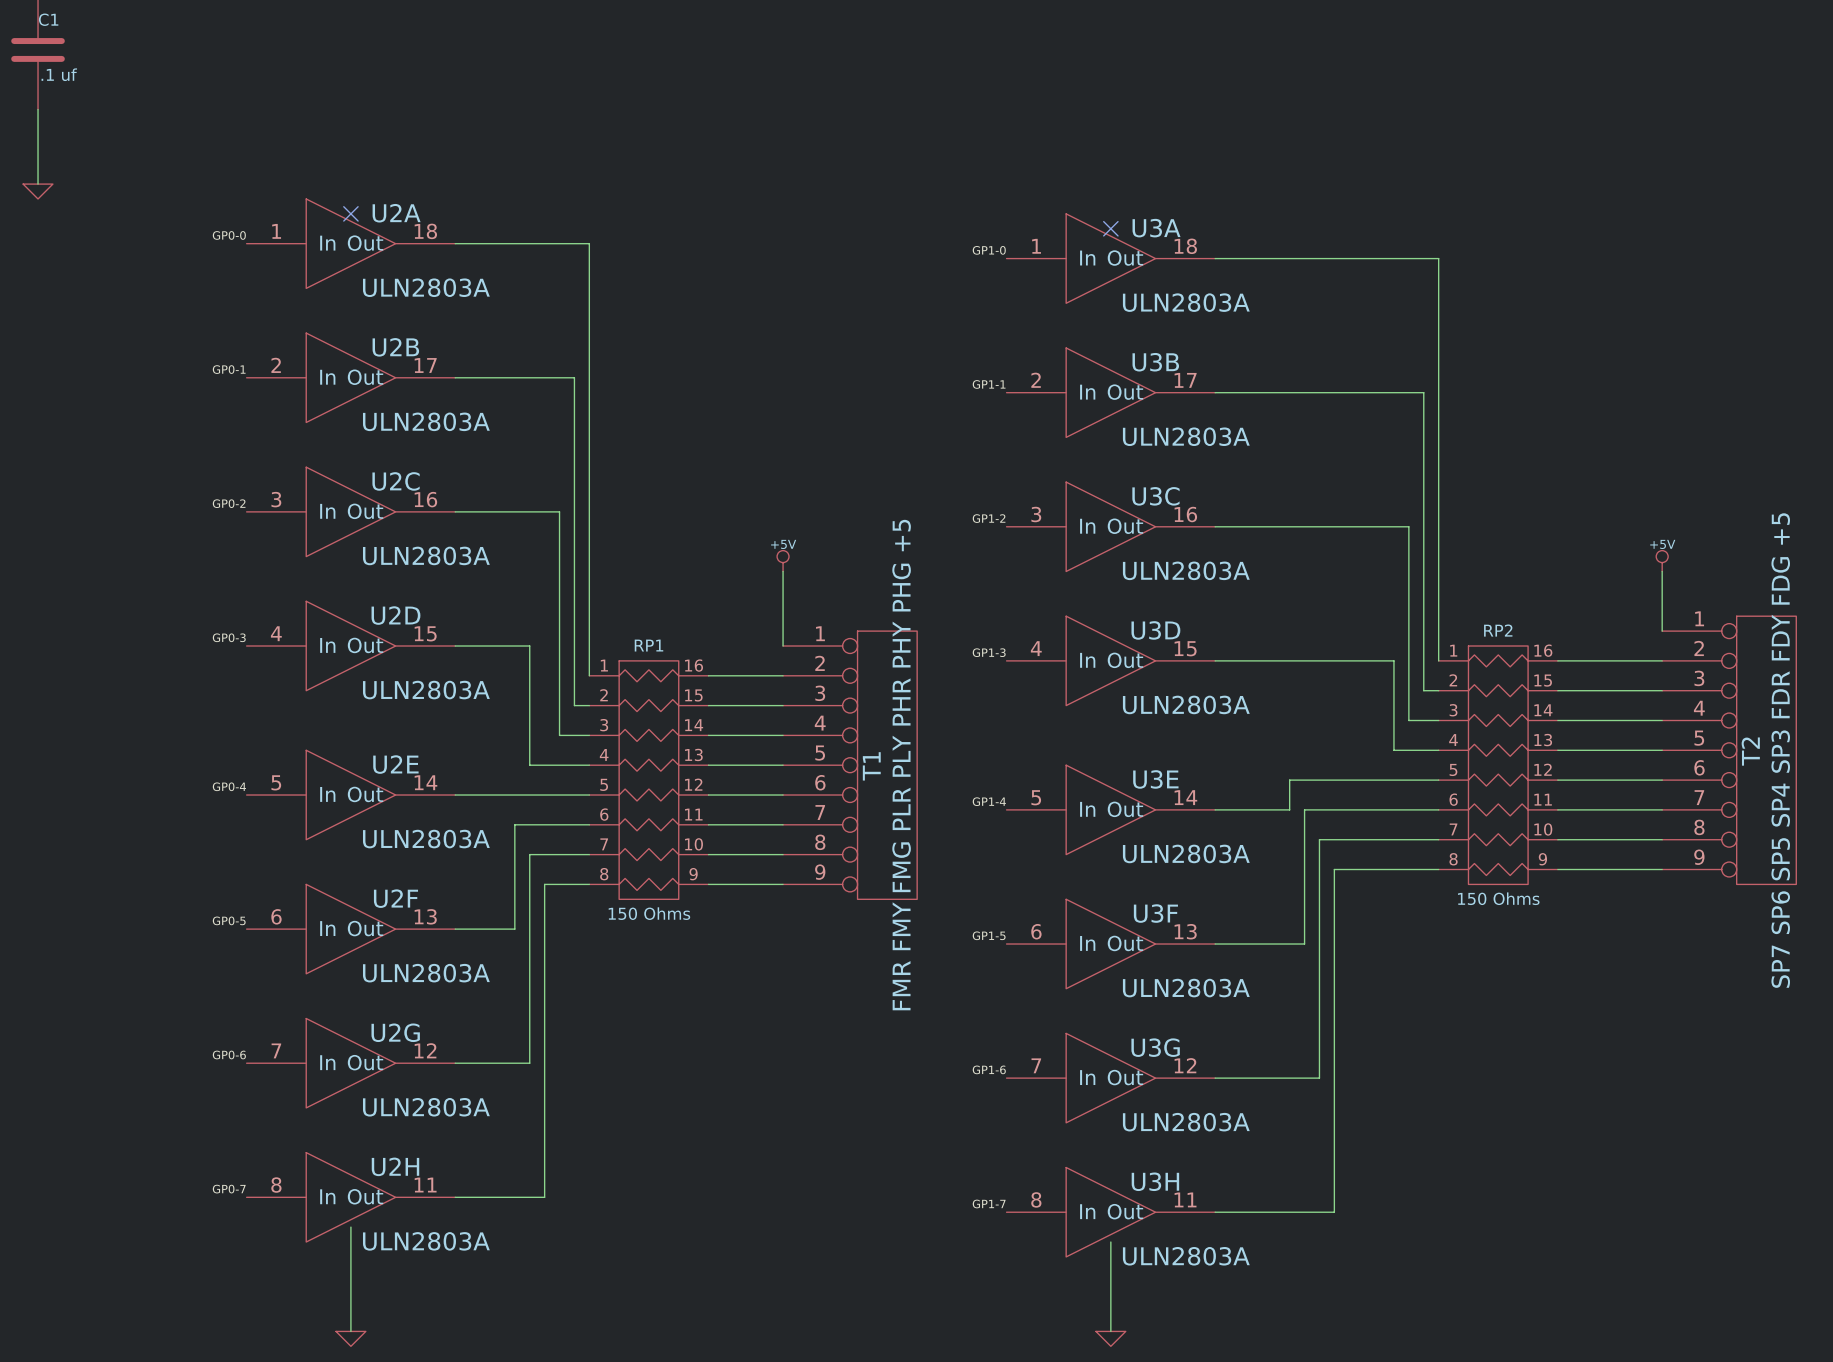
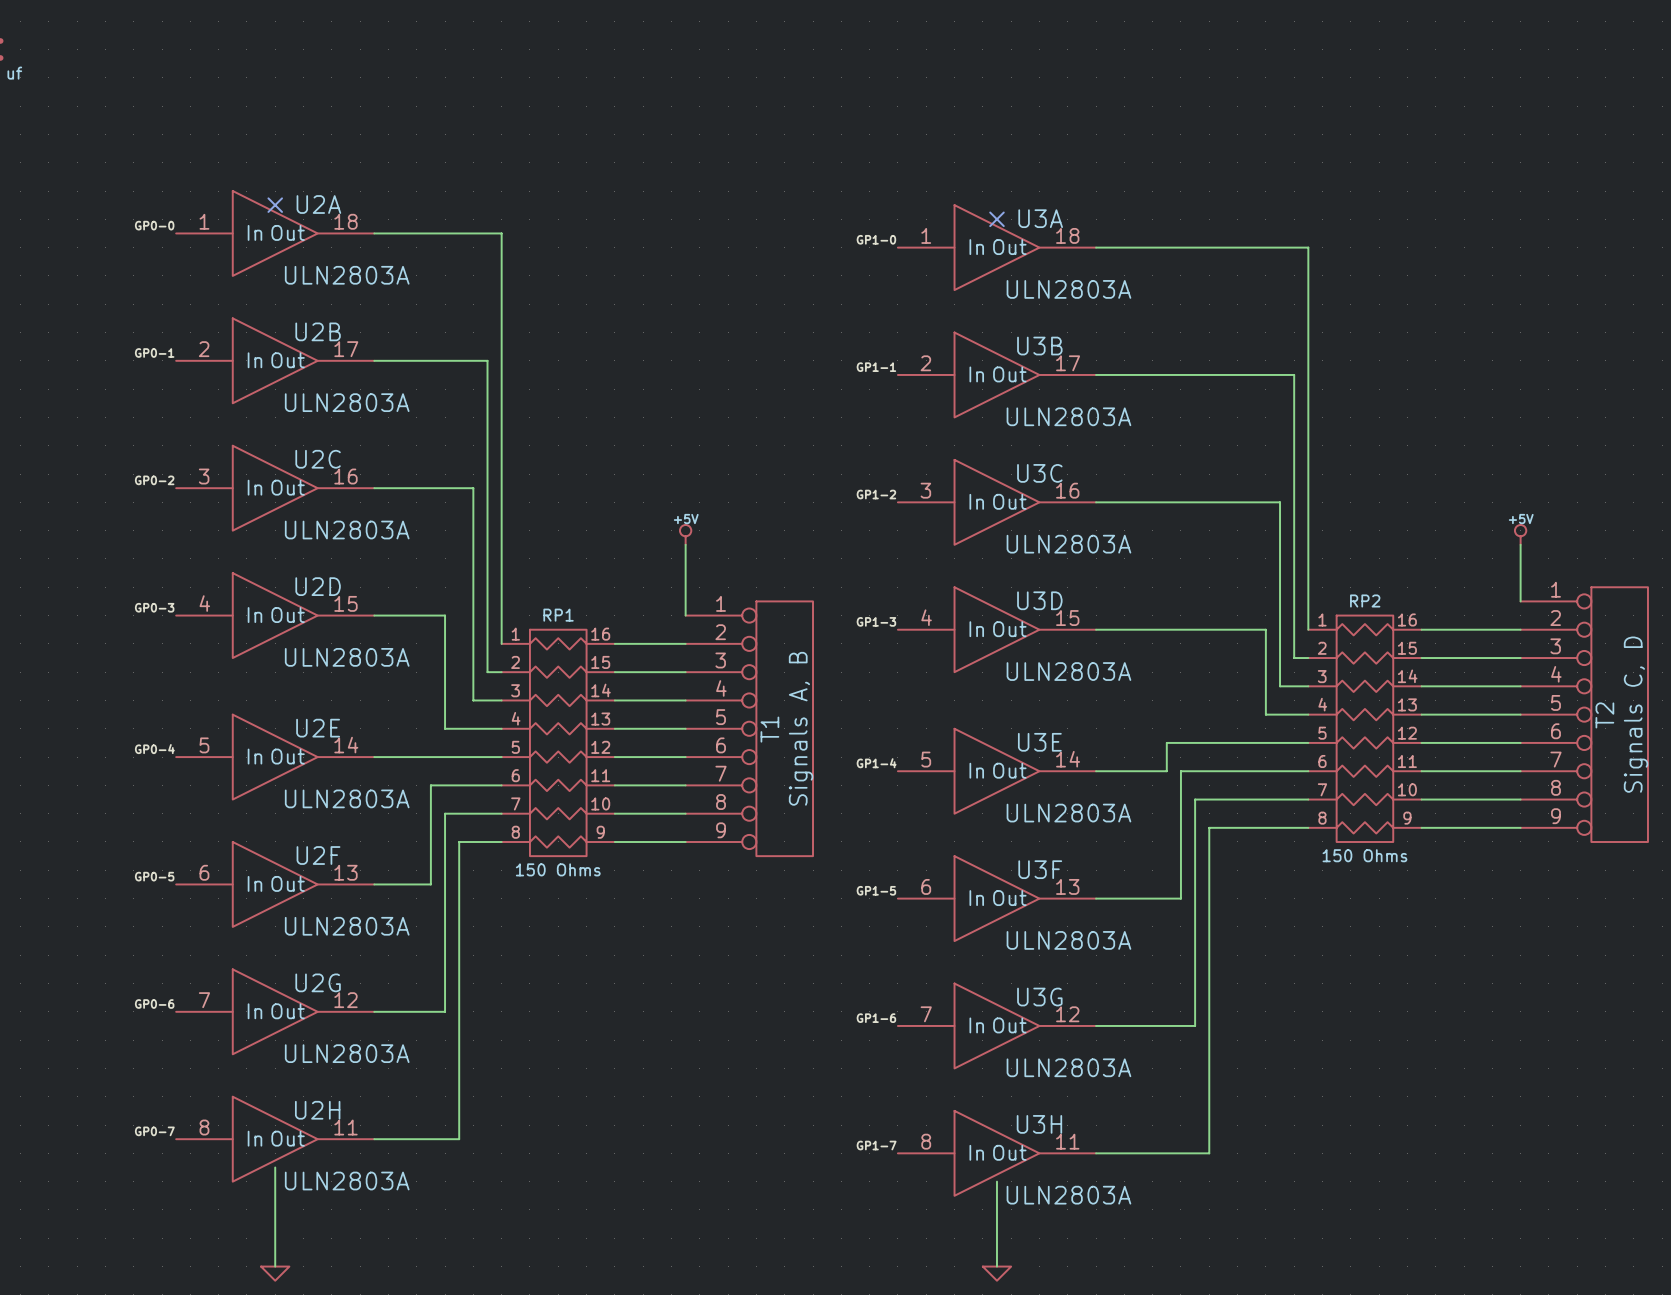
T2 value: SP7 SP6 SP5 SP4 SP3 FDR FDY FDG +5 (1780, 750) -> Signals C, D (1636, 714)
T1 value: FMR FMY FMG PLR PLY PHR PHY PHG +5 (901, 765) -> Signals A, B (801, 728)

